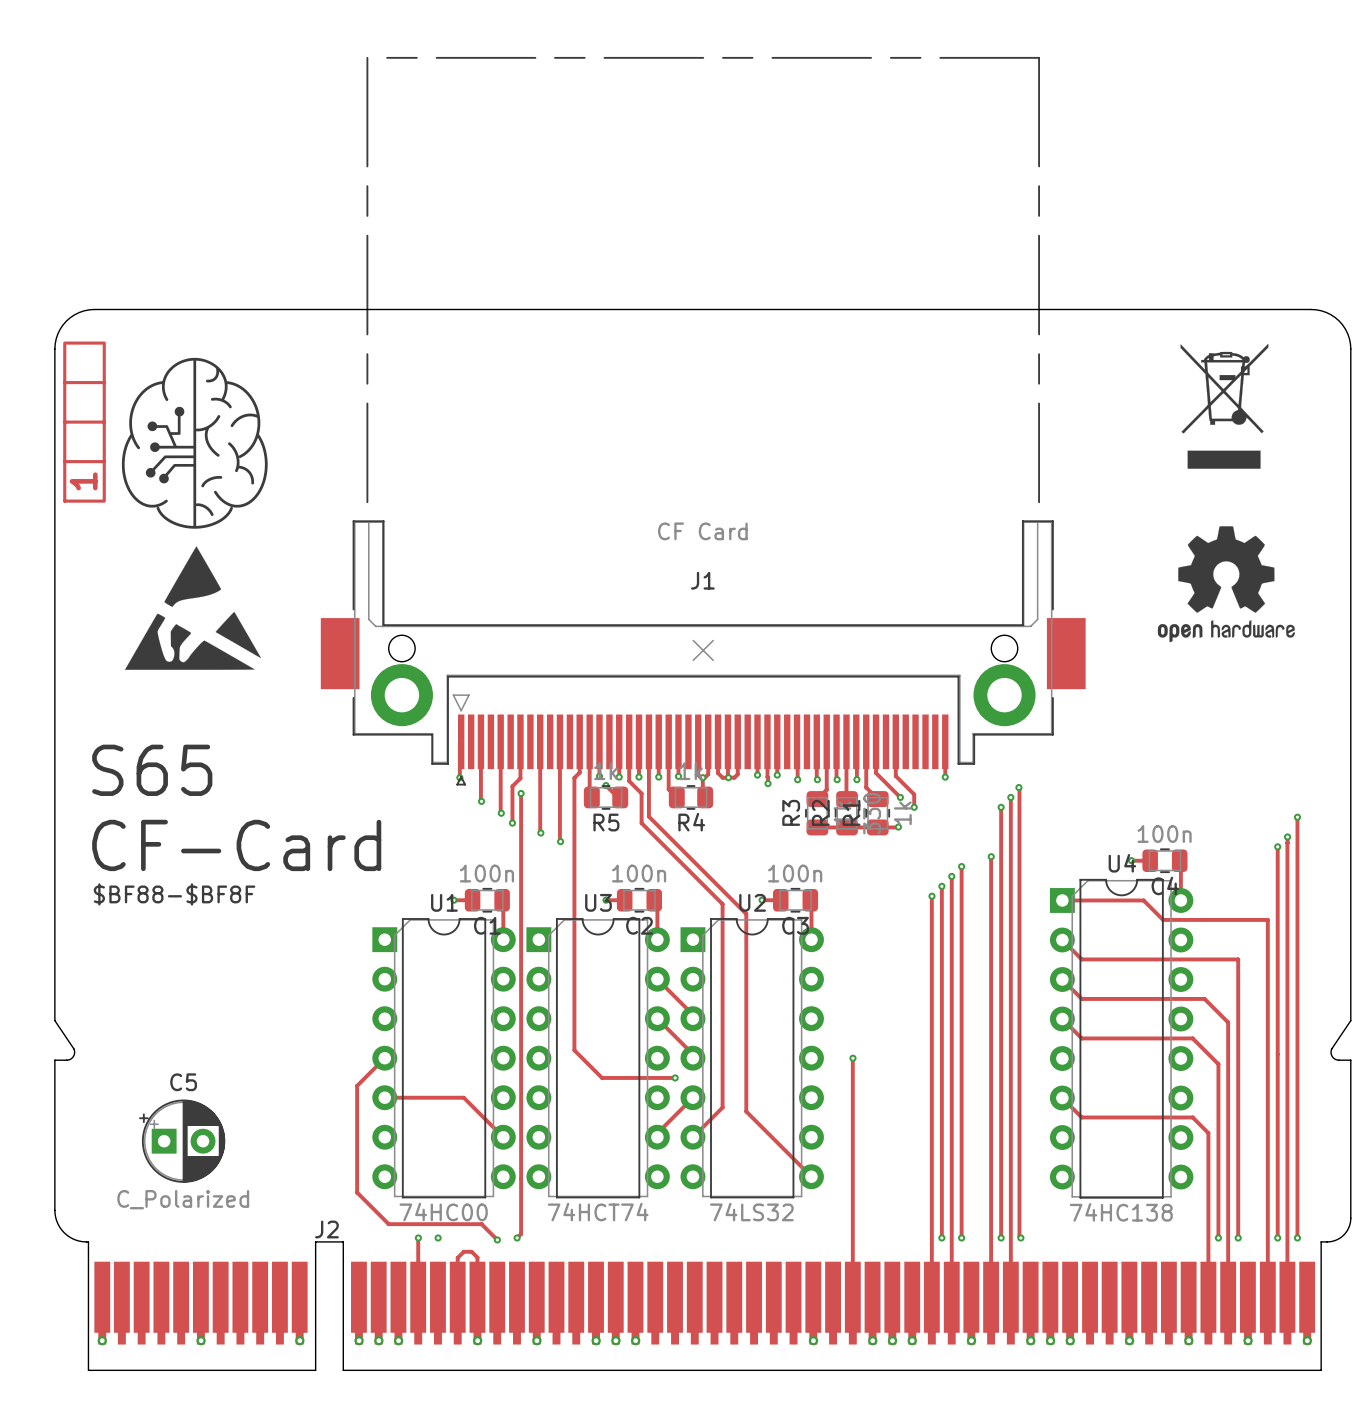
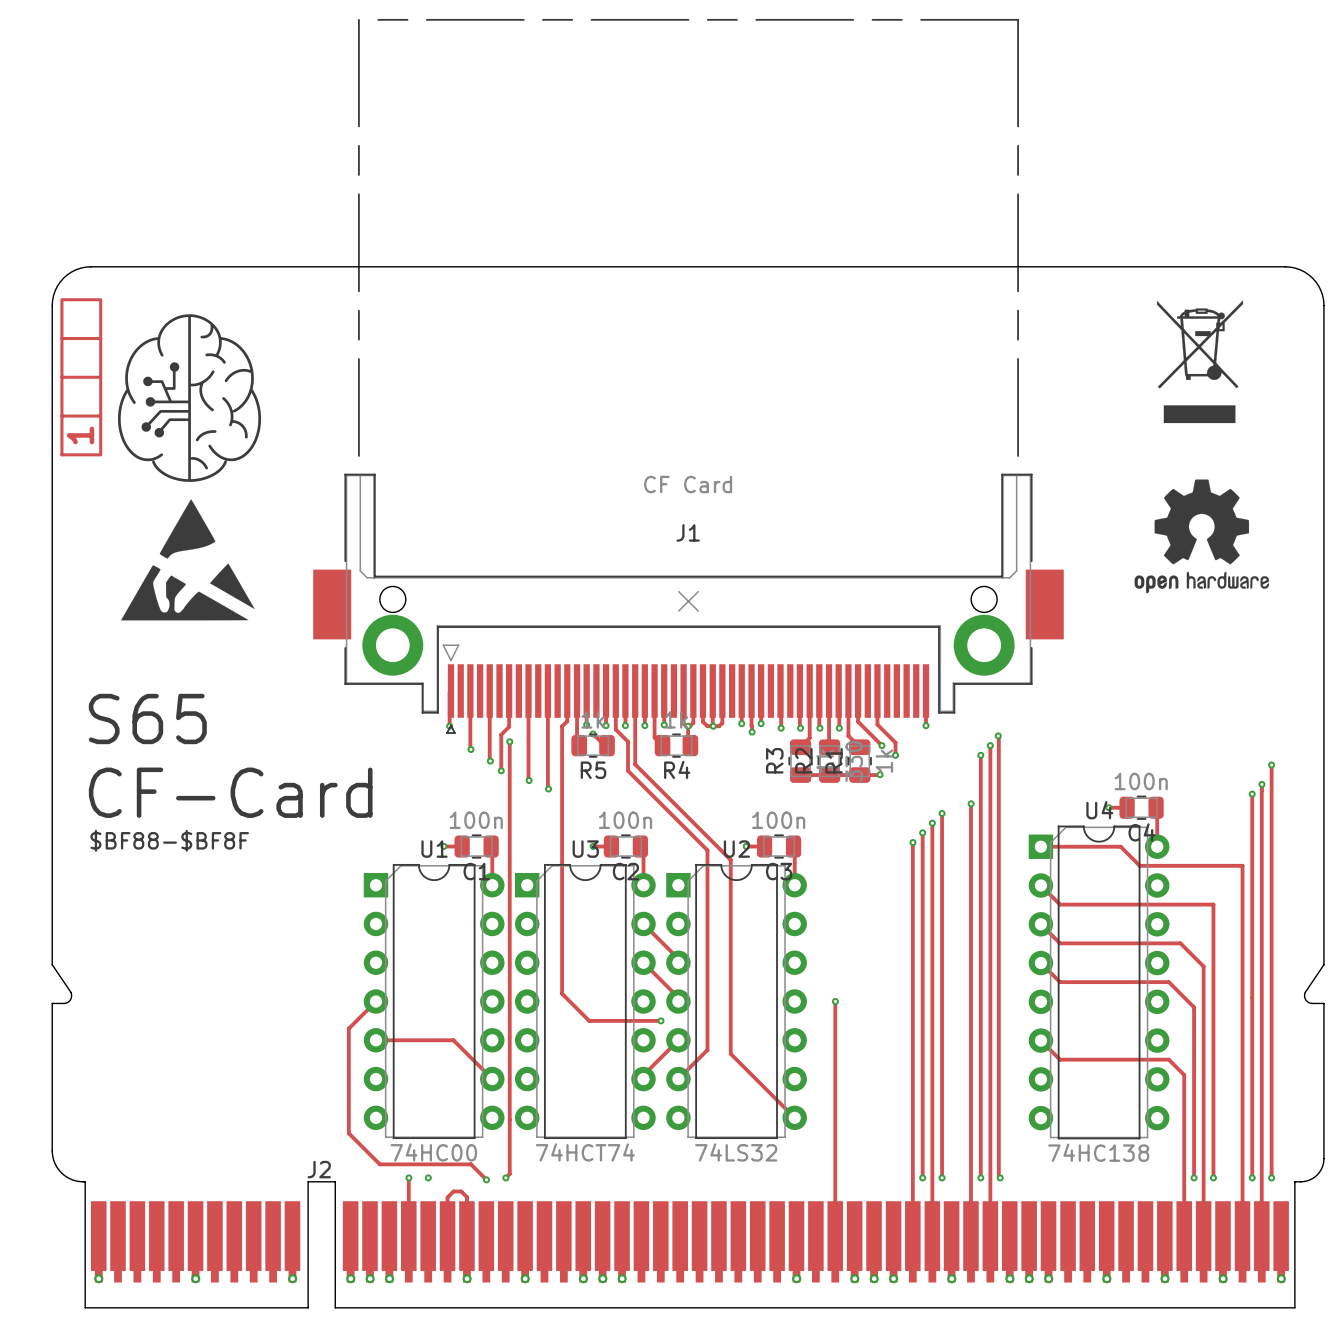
C5: C_Polarized (182, 1141) -> none

